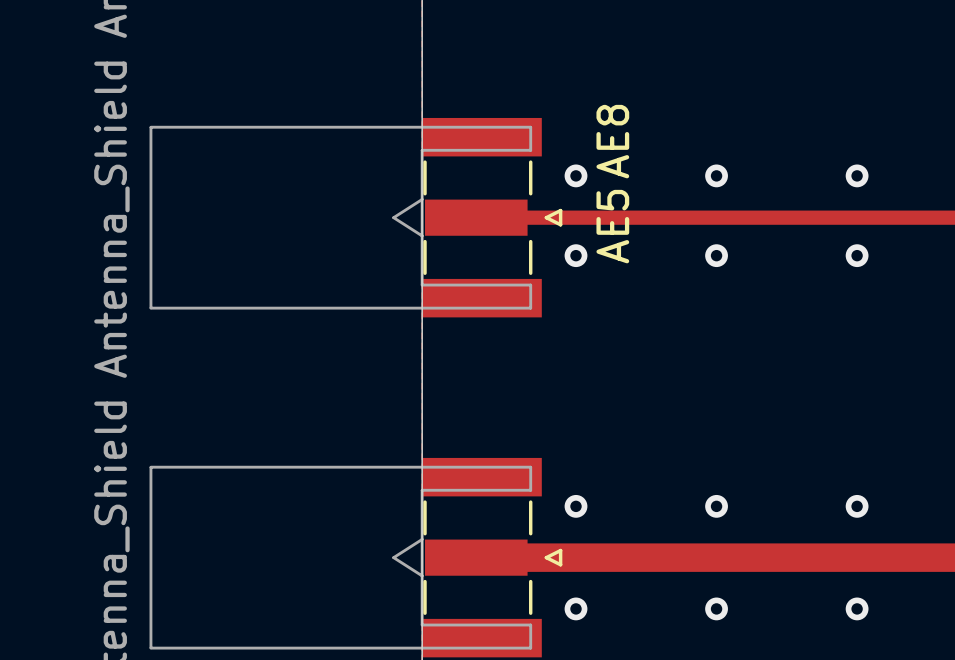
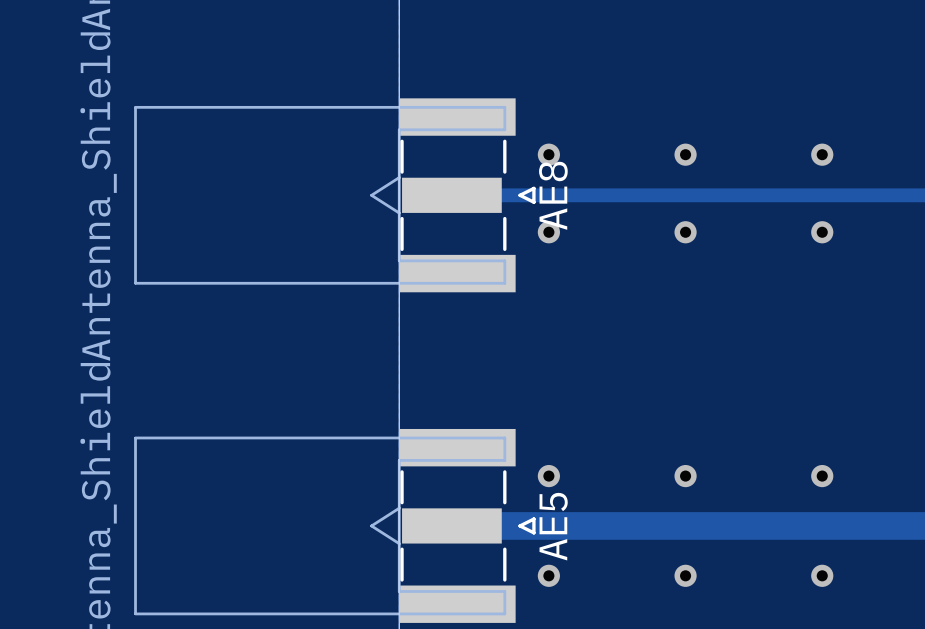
AE8 name position: AE8 (612, 141) -> AE8 (553, 195)
AE5 name position: AE5 (612, 226) -> AE5 (553, 526)

